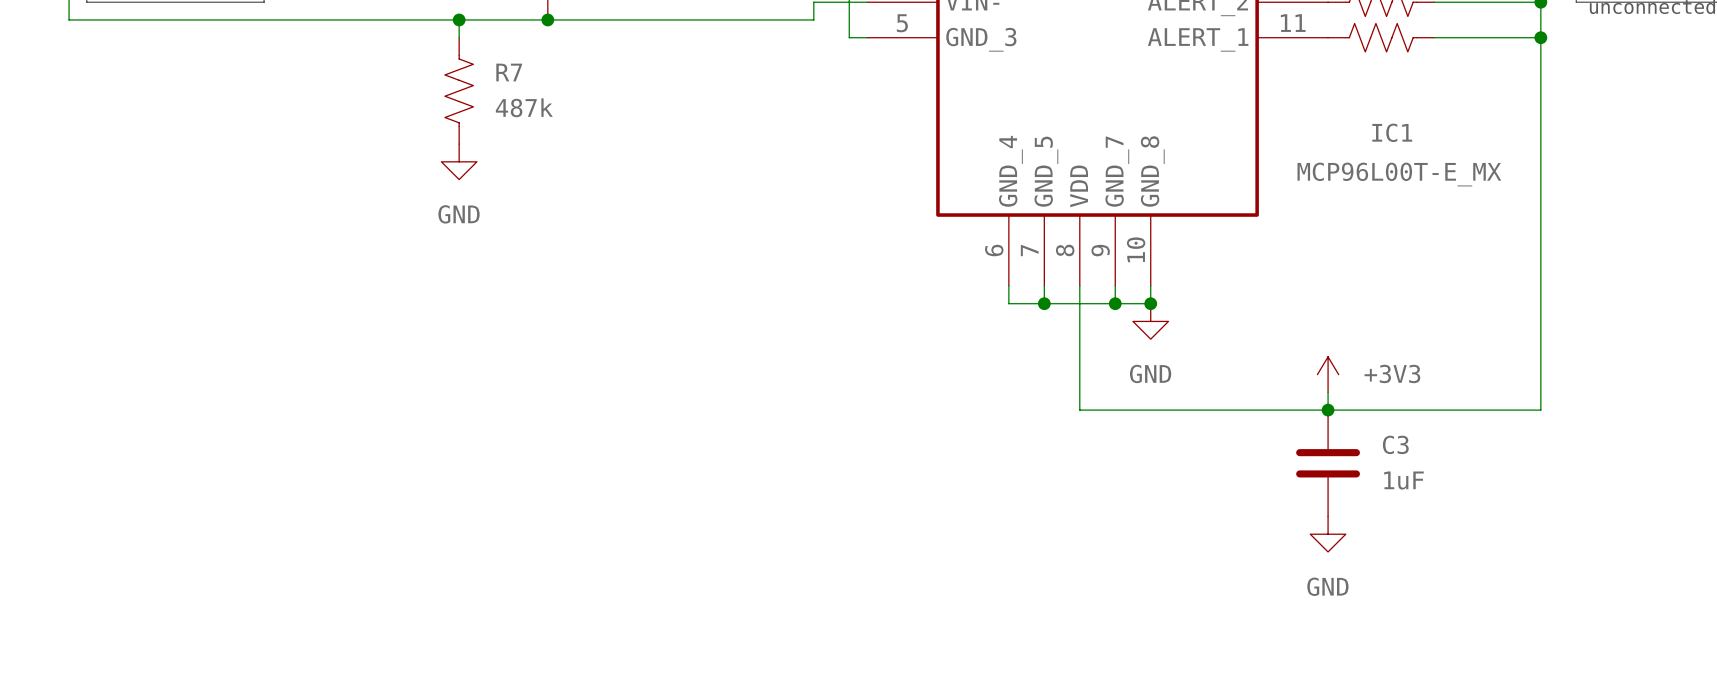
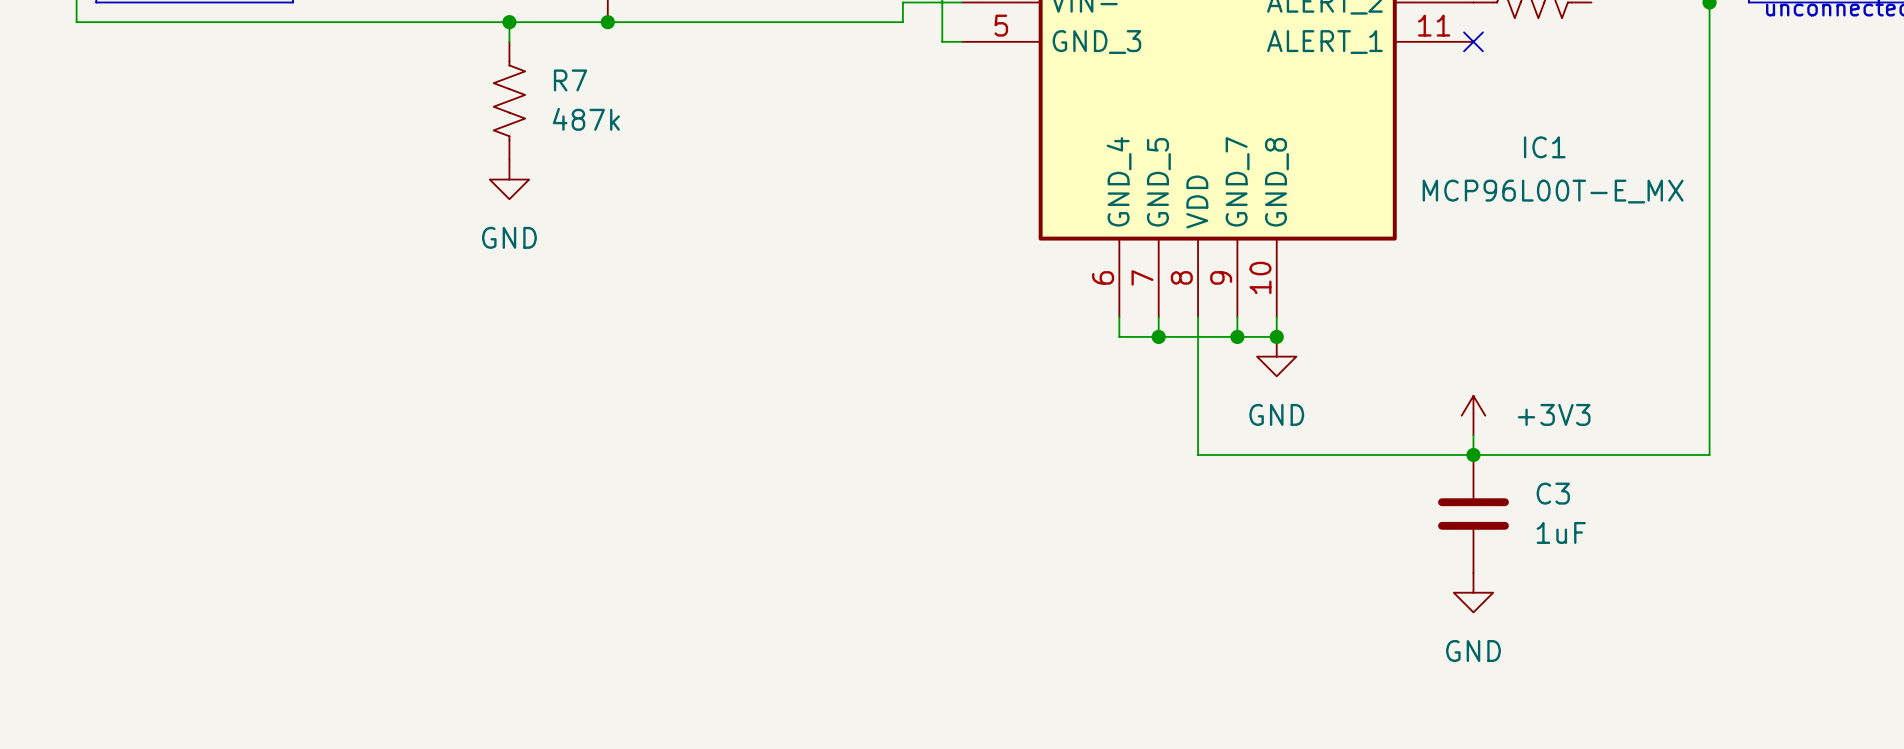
wire: (1434, 2) (1540, 2) -> none
no-connect mark: none -> (1473, 41)
part: (1381, 37) -> none
wire: (1434, 37) (1540, 37) -> none
junction: (1540, 37) -> none

